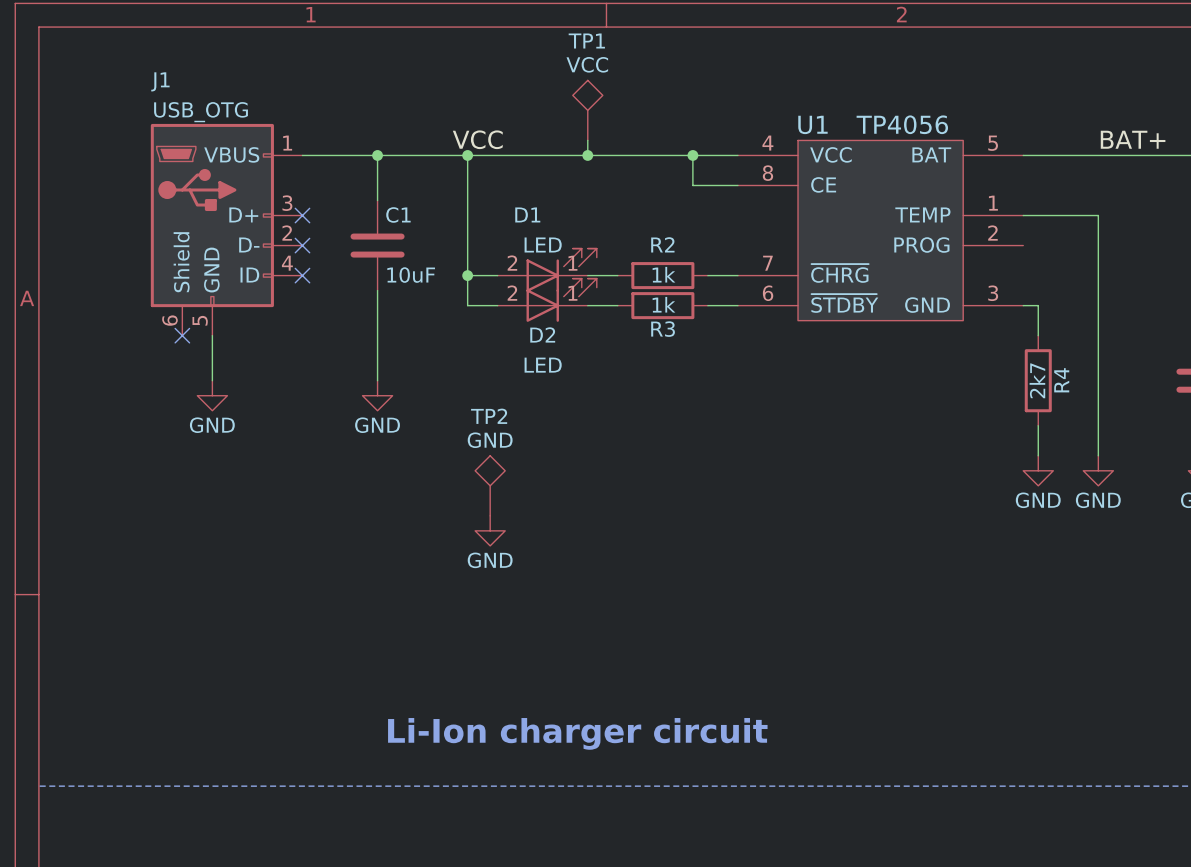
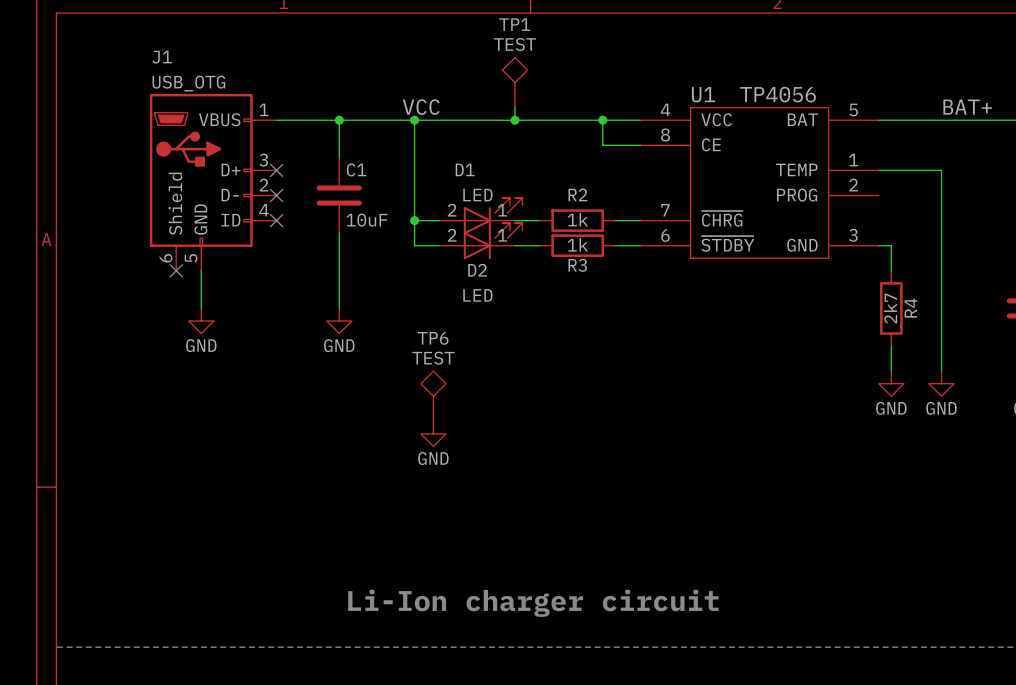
TP1 value: VCC (587, 64) -> TEST (514, 44)
TP2 name: TP2 (489, 416) -> TP6 (433, 338)
TP2 value: GND (490, 440) -> TEST (433, 358)

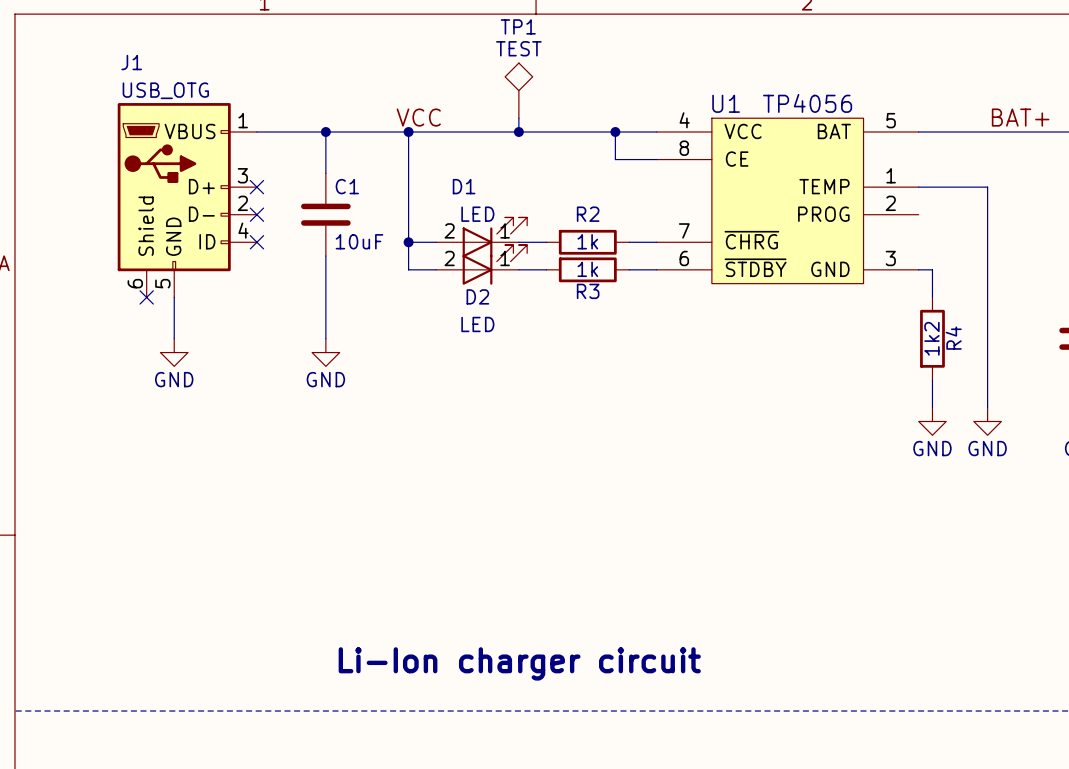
R4 value: 2k7 (890, 308) -> 1k2 (931, 338)
TP6: TEST (433, 396) -> none
power symbol: GND (433, 433) -> none

